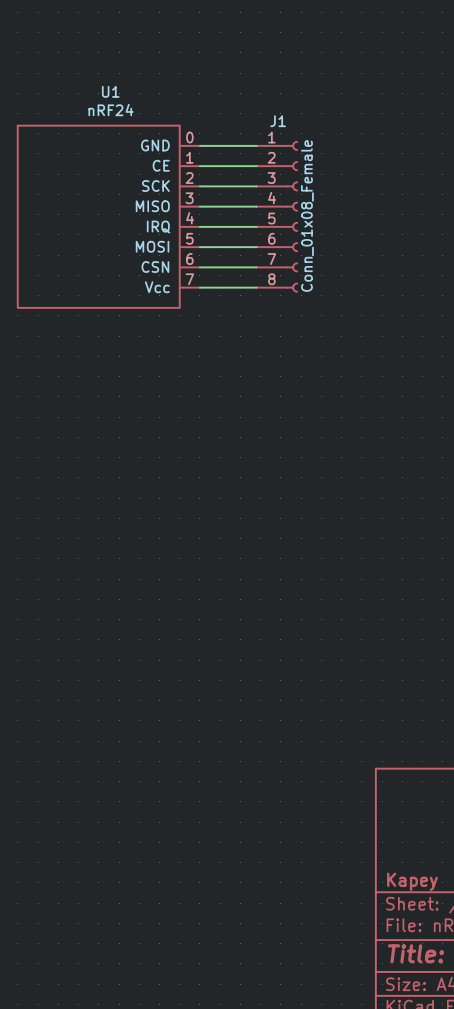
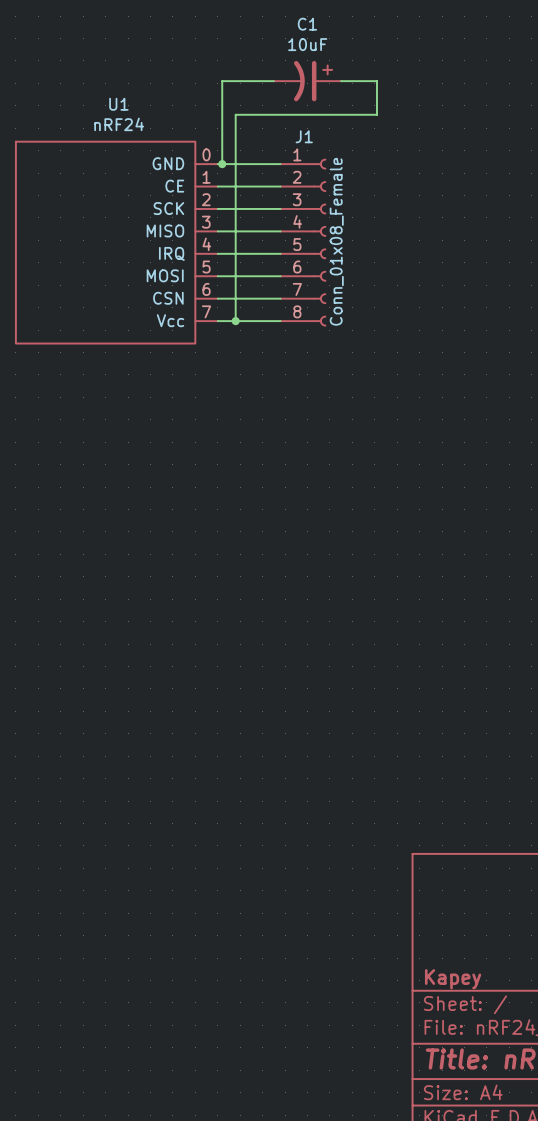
wire: none -> (273, 81) (222, 81) (222, 164)
C1: none -> 10uF (307, 81)
wire: none -> (341, 81) (376, 81) (376, 114) (235, 114) (235, 321)
junction: none -> (222, 164)
junction: none -> (235, 321)

